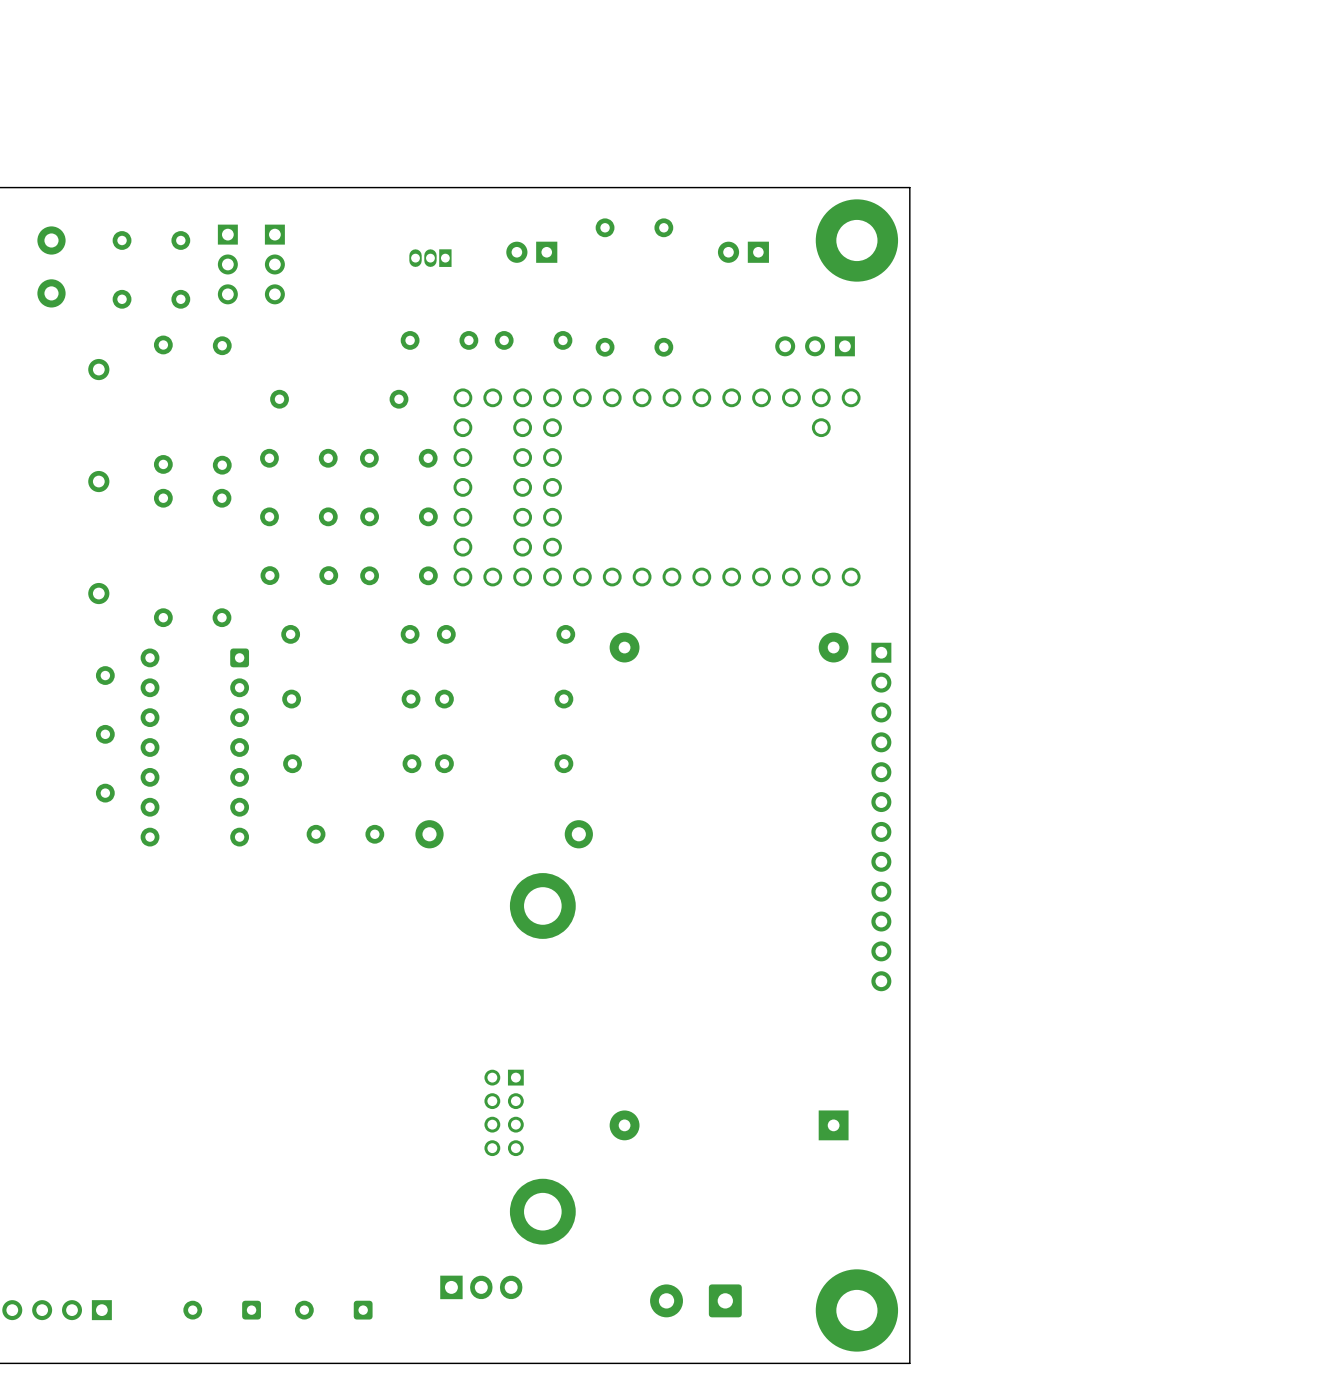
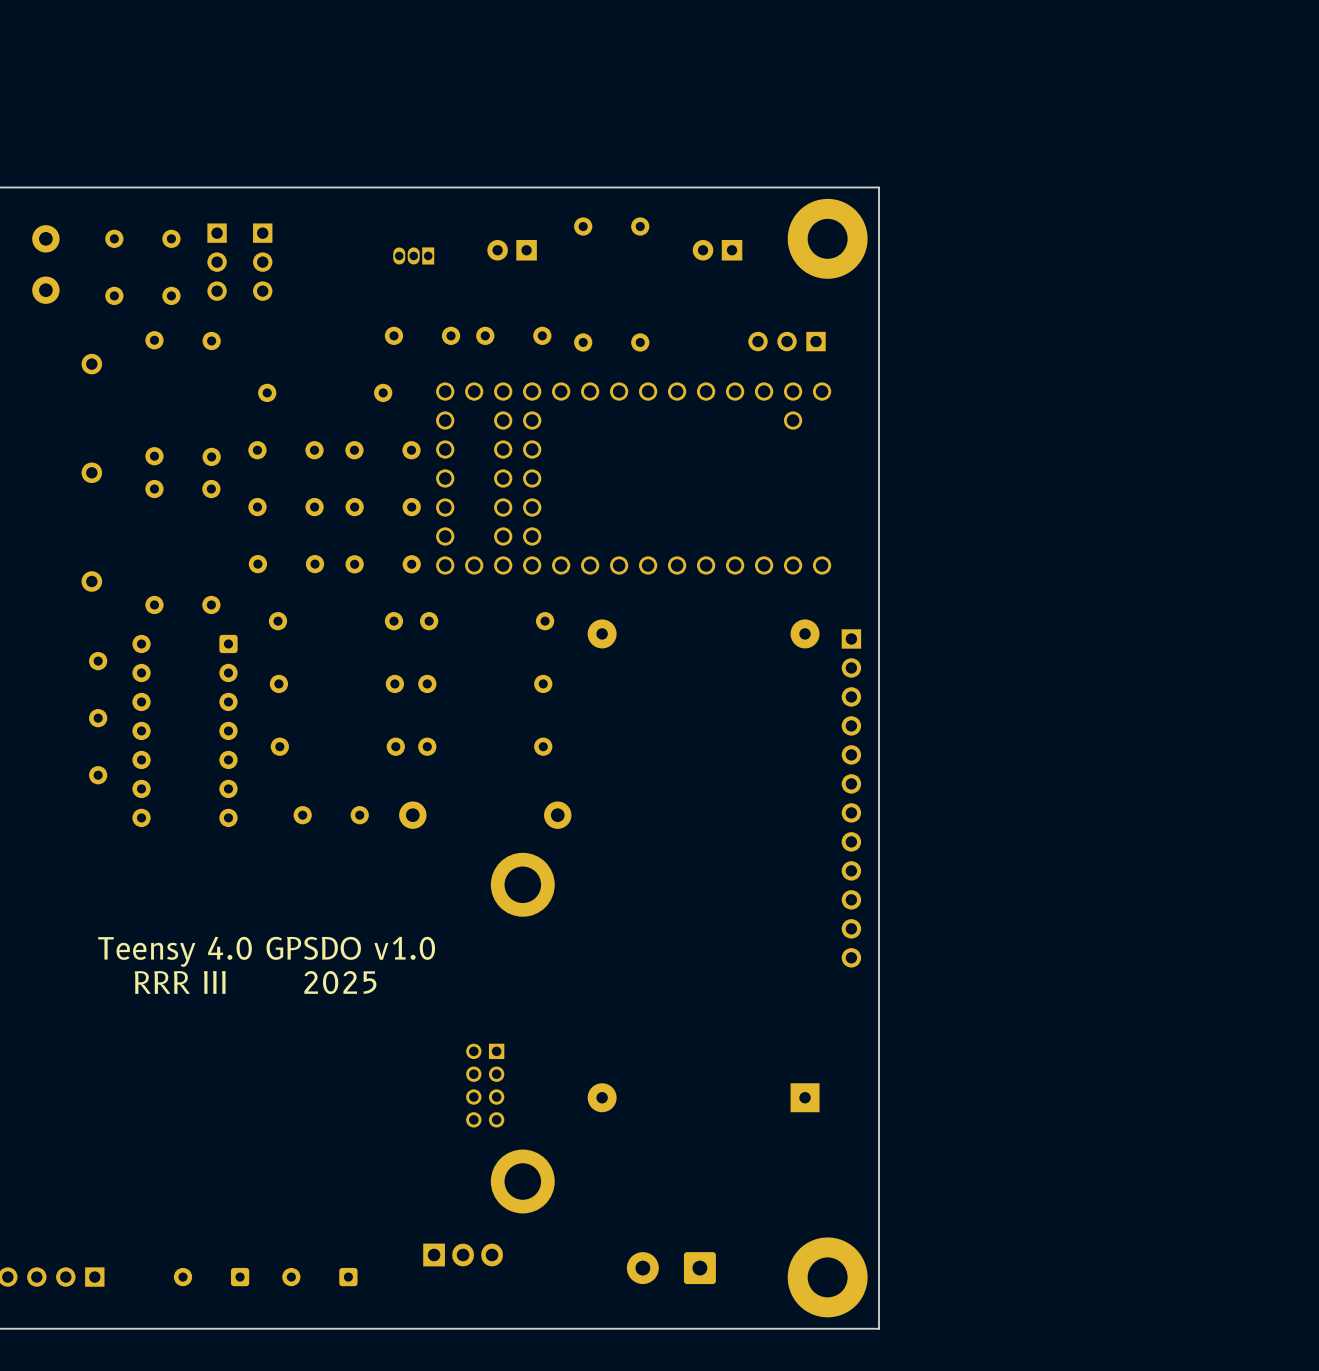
text: none -> Teensy 4.0 GPSDO v1.0 (266, 951)
text: none -> RRR III 2025 (255, 982)

